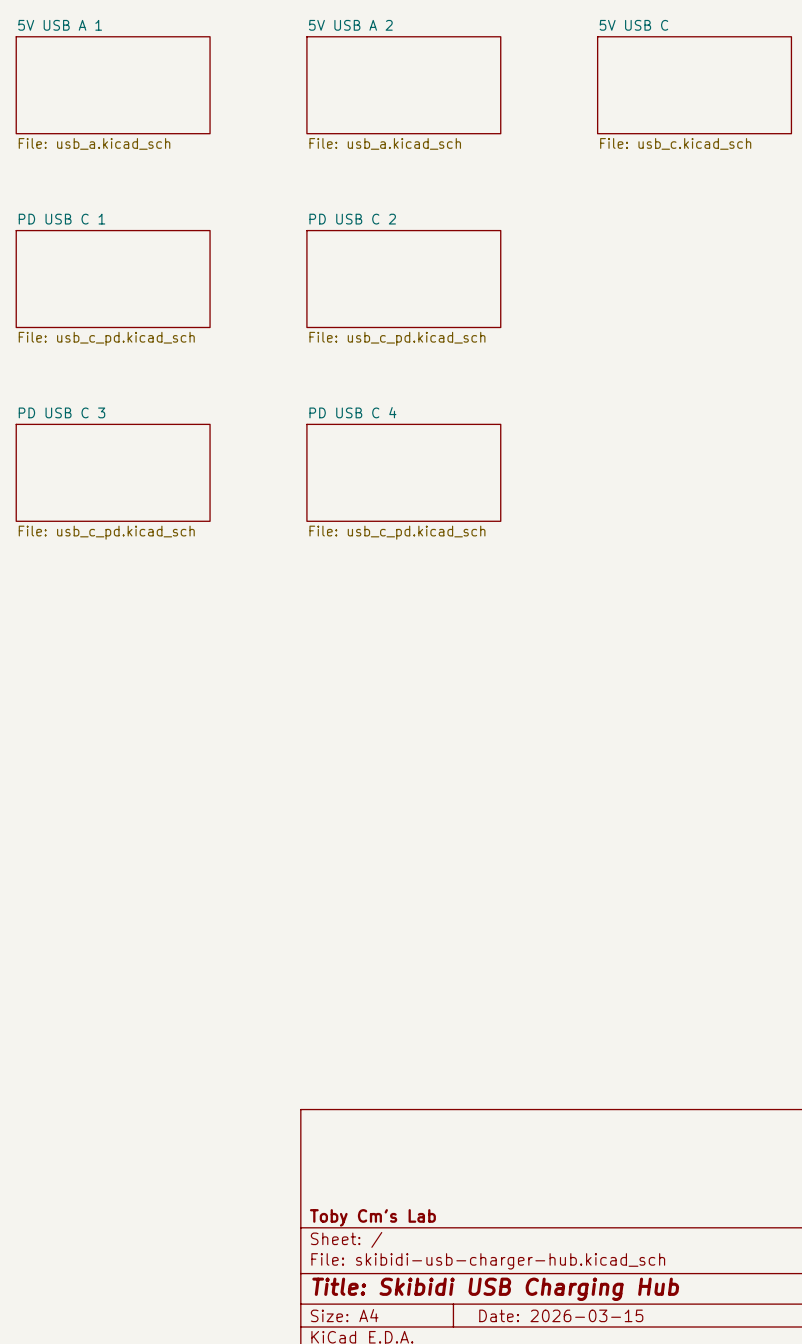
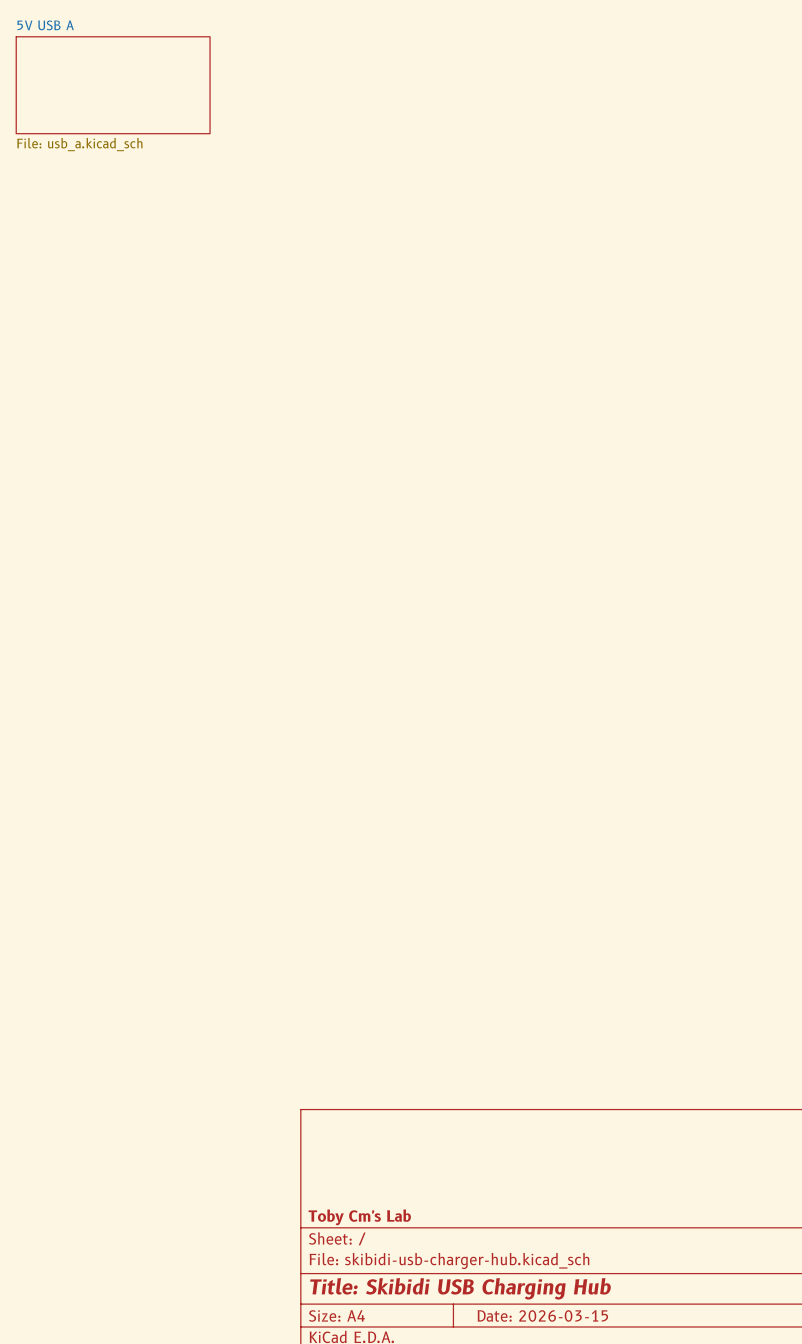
sheet 5V USB A 1 name: 5V USB A 1 (60, 25) -> 5V USB A (45, 25)
sheet 5V USB A 2: File: usb_a.kicad_sch (403, 85) -> none
sheet 5V USB C: File: usb_c.kicad_sch (694, 85) -> none
sheet PD USB C 1: File: usb_c_pd.kicad_sch (113, 279) -> none
sheet PD USB C 2: File: usb_c_pd.kicad_sch (403, 279) -> none
sheet PD USB C 3: File: usb_c_pd.kicad_sch (113, 472) -> none
sheet PD USB C 4: File: usb_c_pd.kicad_sch (403, 472) -> none

